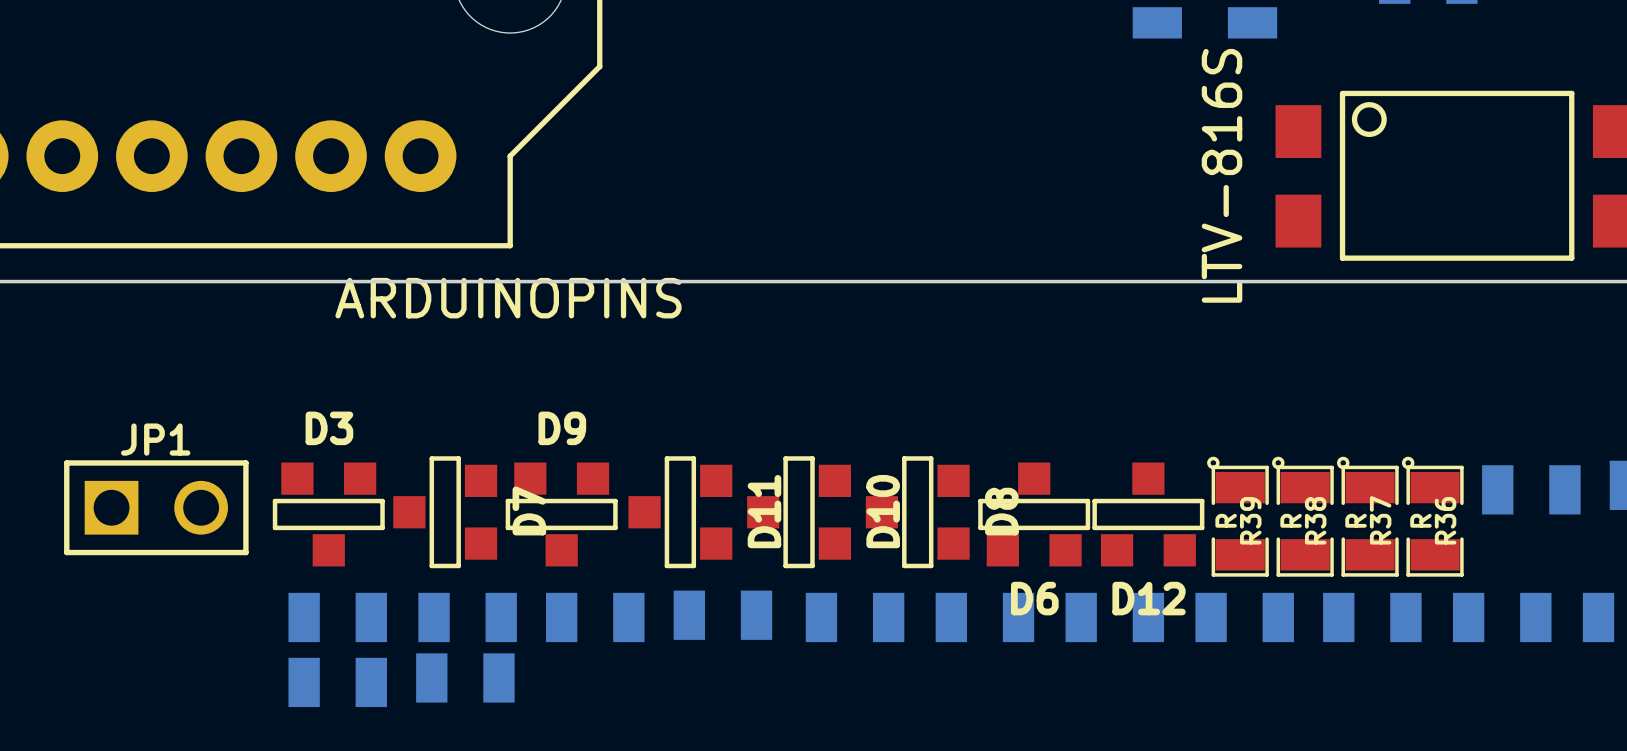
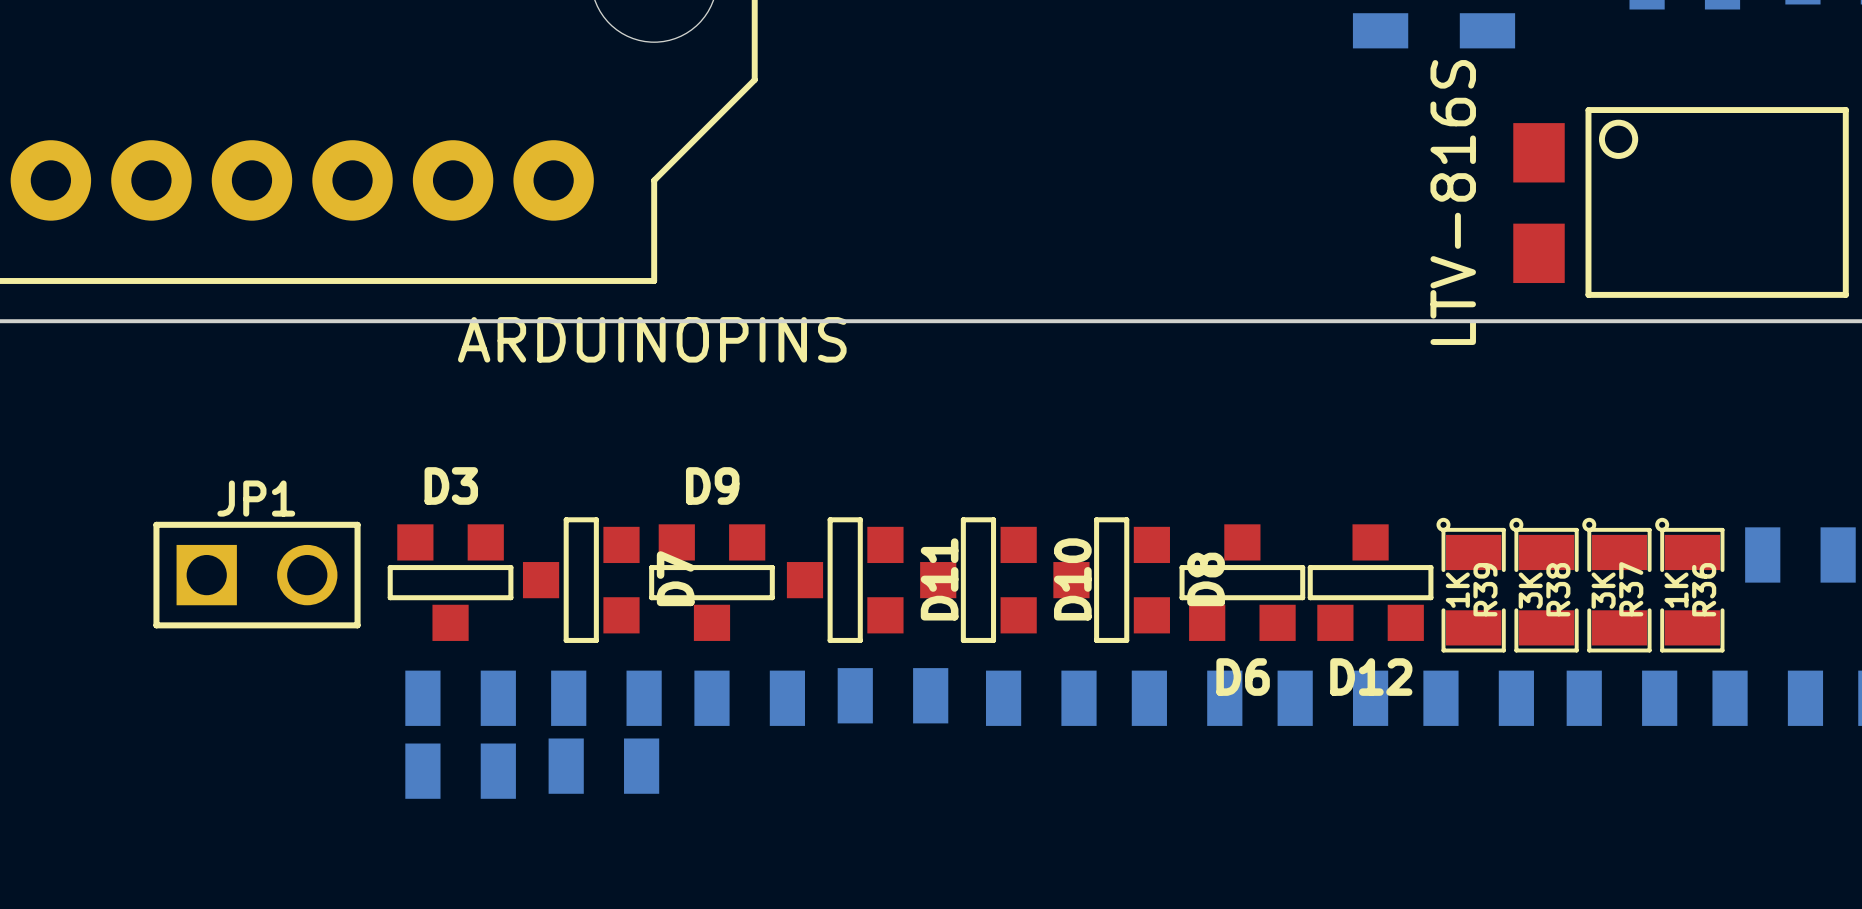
R39 value: R (1226, 520) -> 1K (1457, 590)
R38 value: R (1291, 520) -> 3K (1530, 590)
R37 value: R (1356, 520) -> 3K (1603, 590)
R36 value: R (1420, 520) -> 1K (1676, 590)

